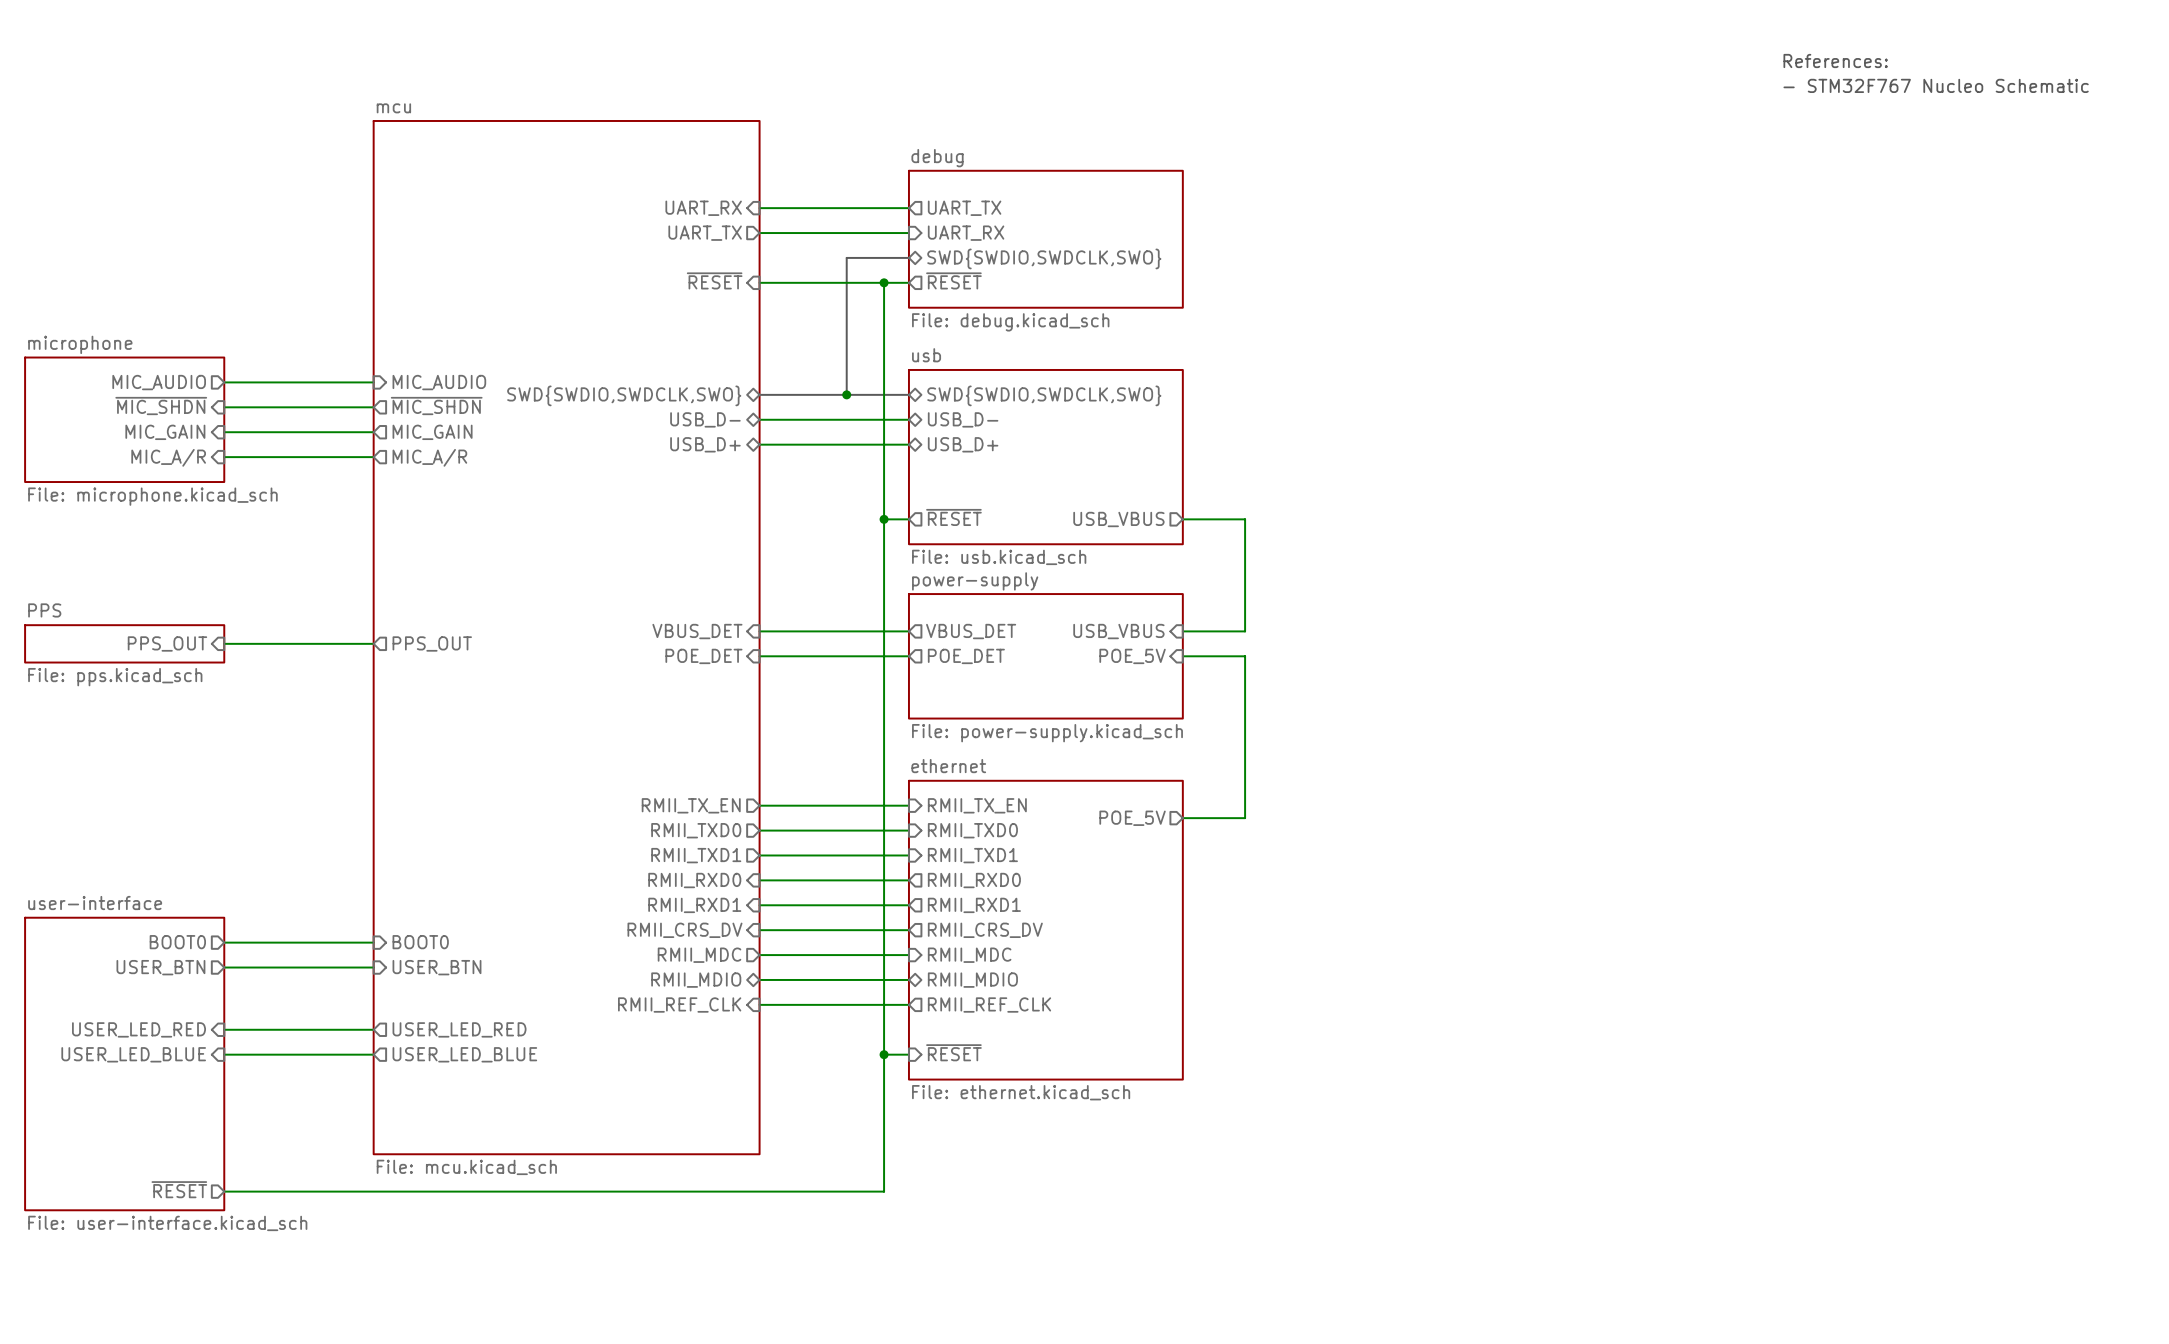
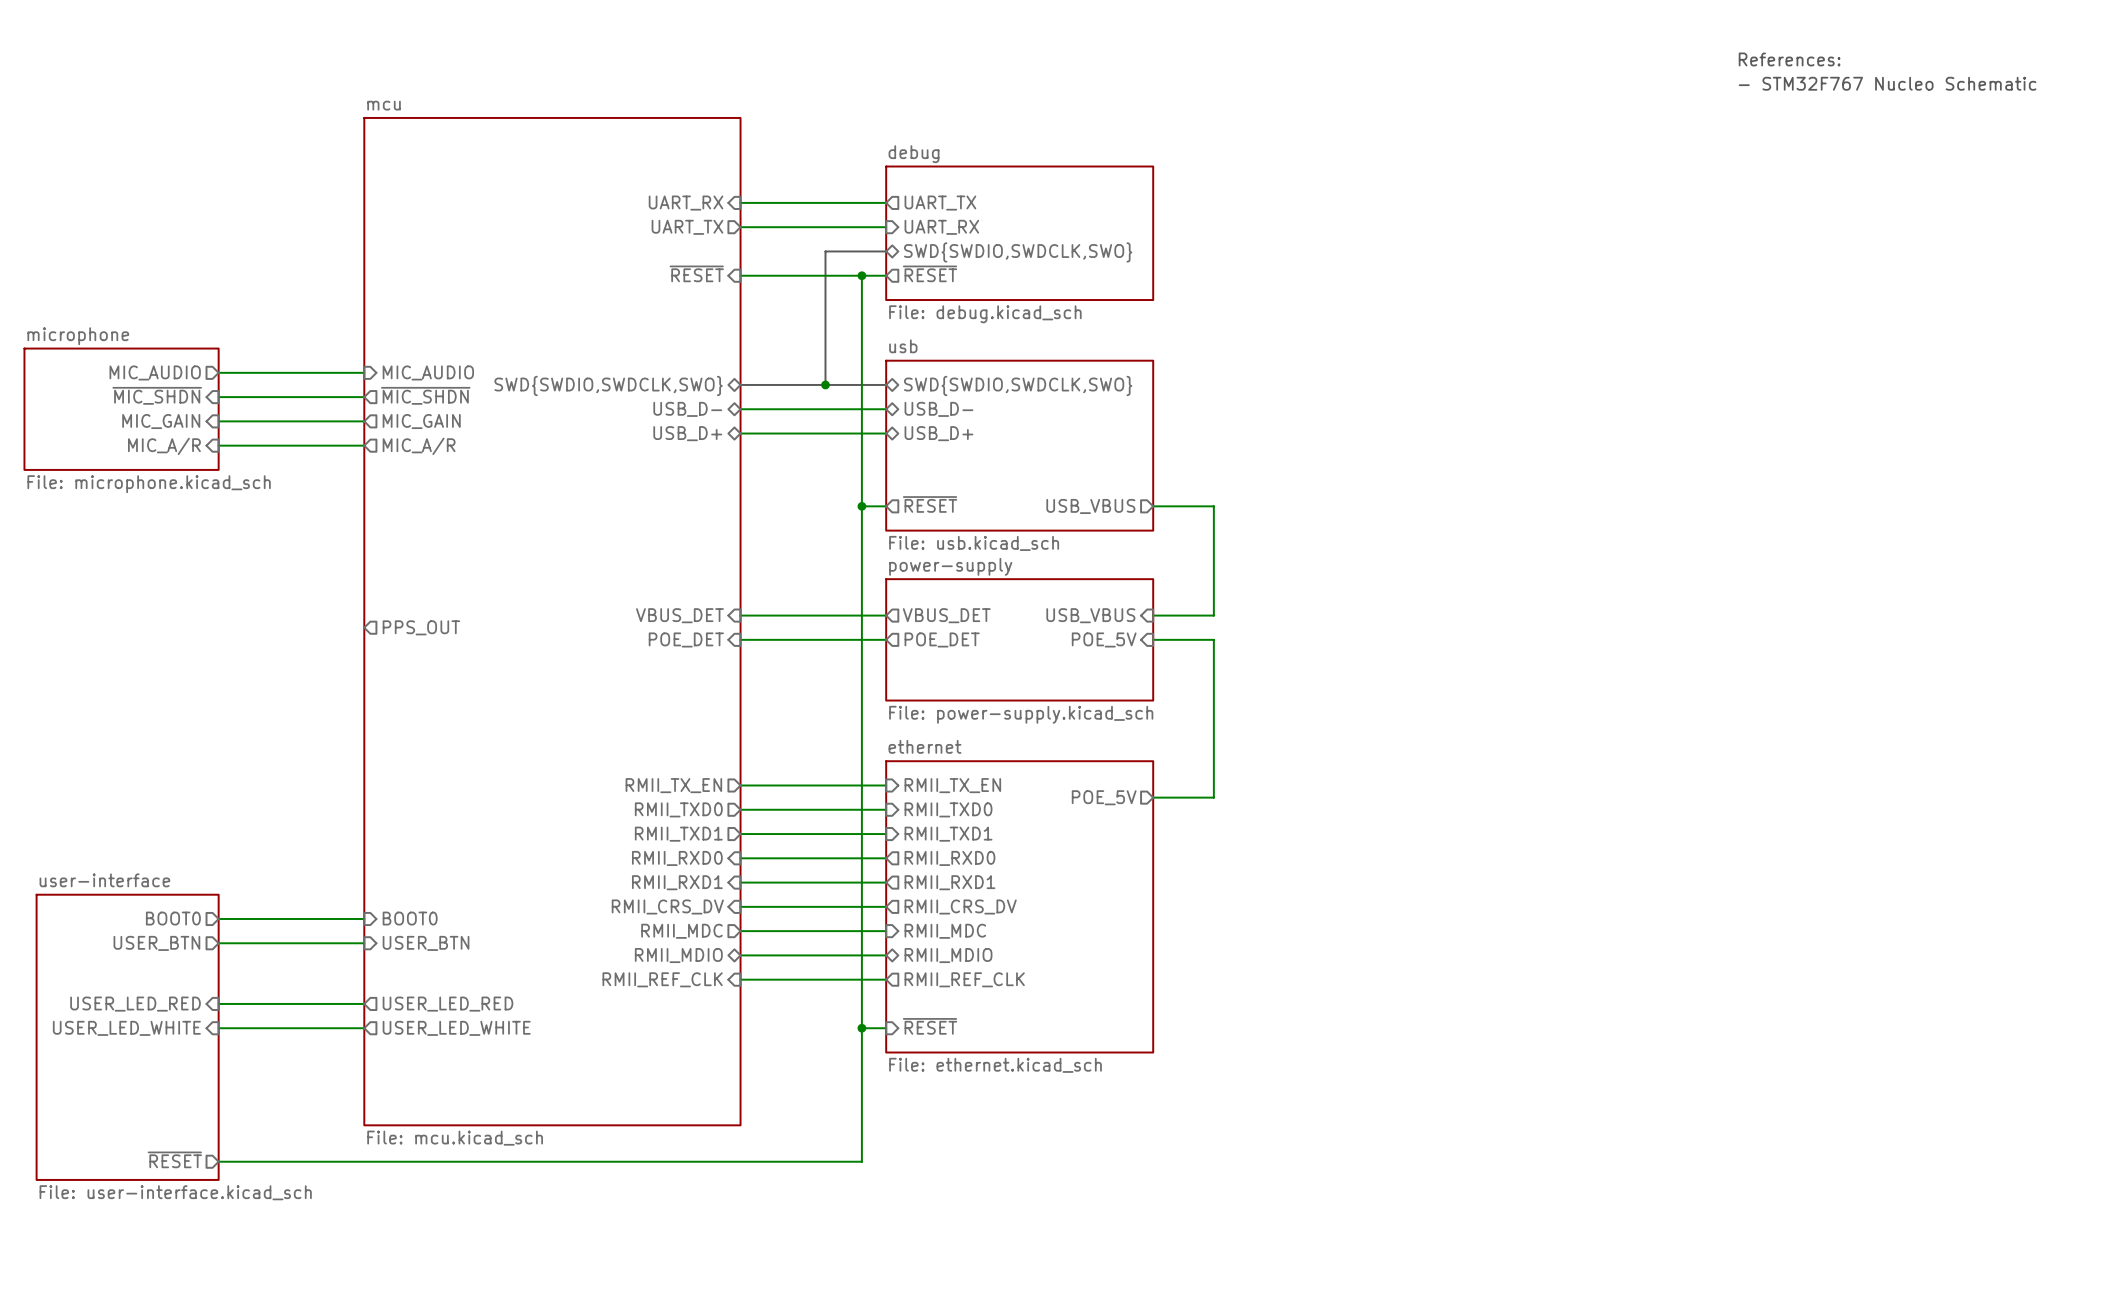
sheet PPS: File: pps.kicad_sch (124, 643) -> none
sheet pin: PPS_OUT (167, 643) -> none
wire: (224, 643) (373, 643) -> none
sheet user-interface shape: [24, 916, 226, 1212] -> [35, 893, 220, 1181]
sheet pin: USER_LED_BLUE (133, 1054) -> USER_LED_WHITE (126, 1028)
sheet pin: USER_LED_BLUE (464, 1054) -> USER_LED_WHITE (456, 1028)

